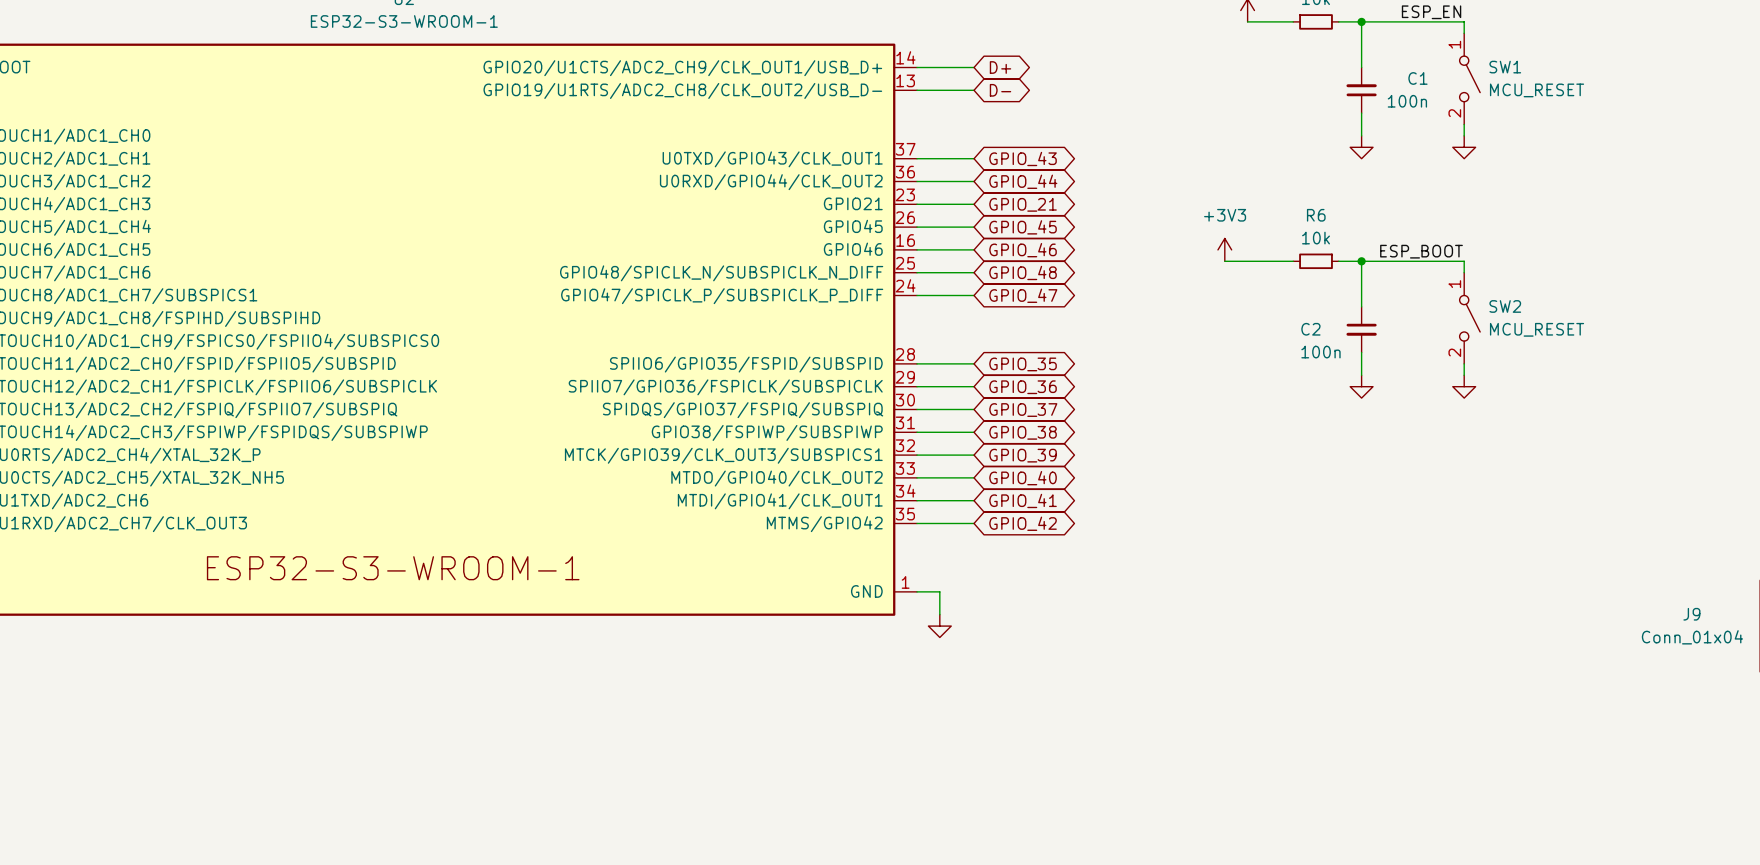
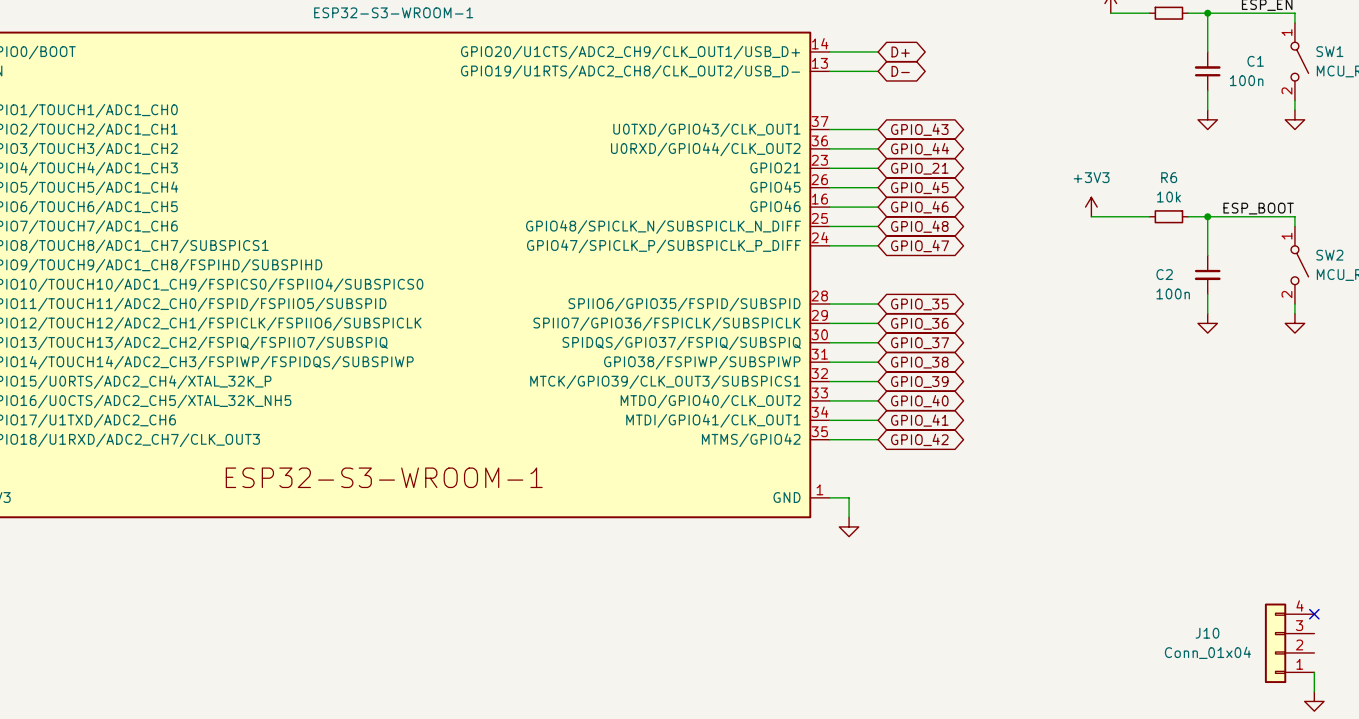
no-connect mark: none -> (1314, 614)
J10: none -> Conn_01x04 (1289, 643)
wire: none -> (1314, 672) (1314, 691)
power symbol: none -> (1314, 701)

